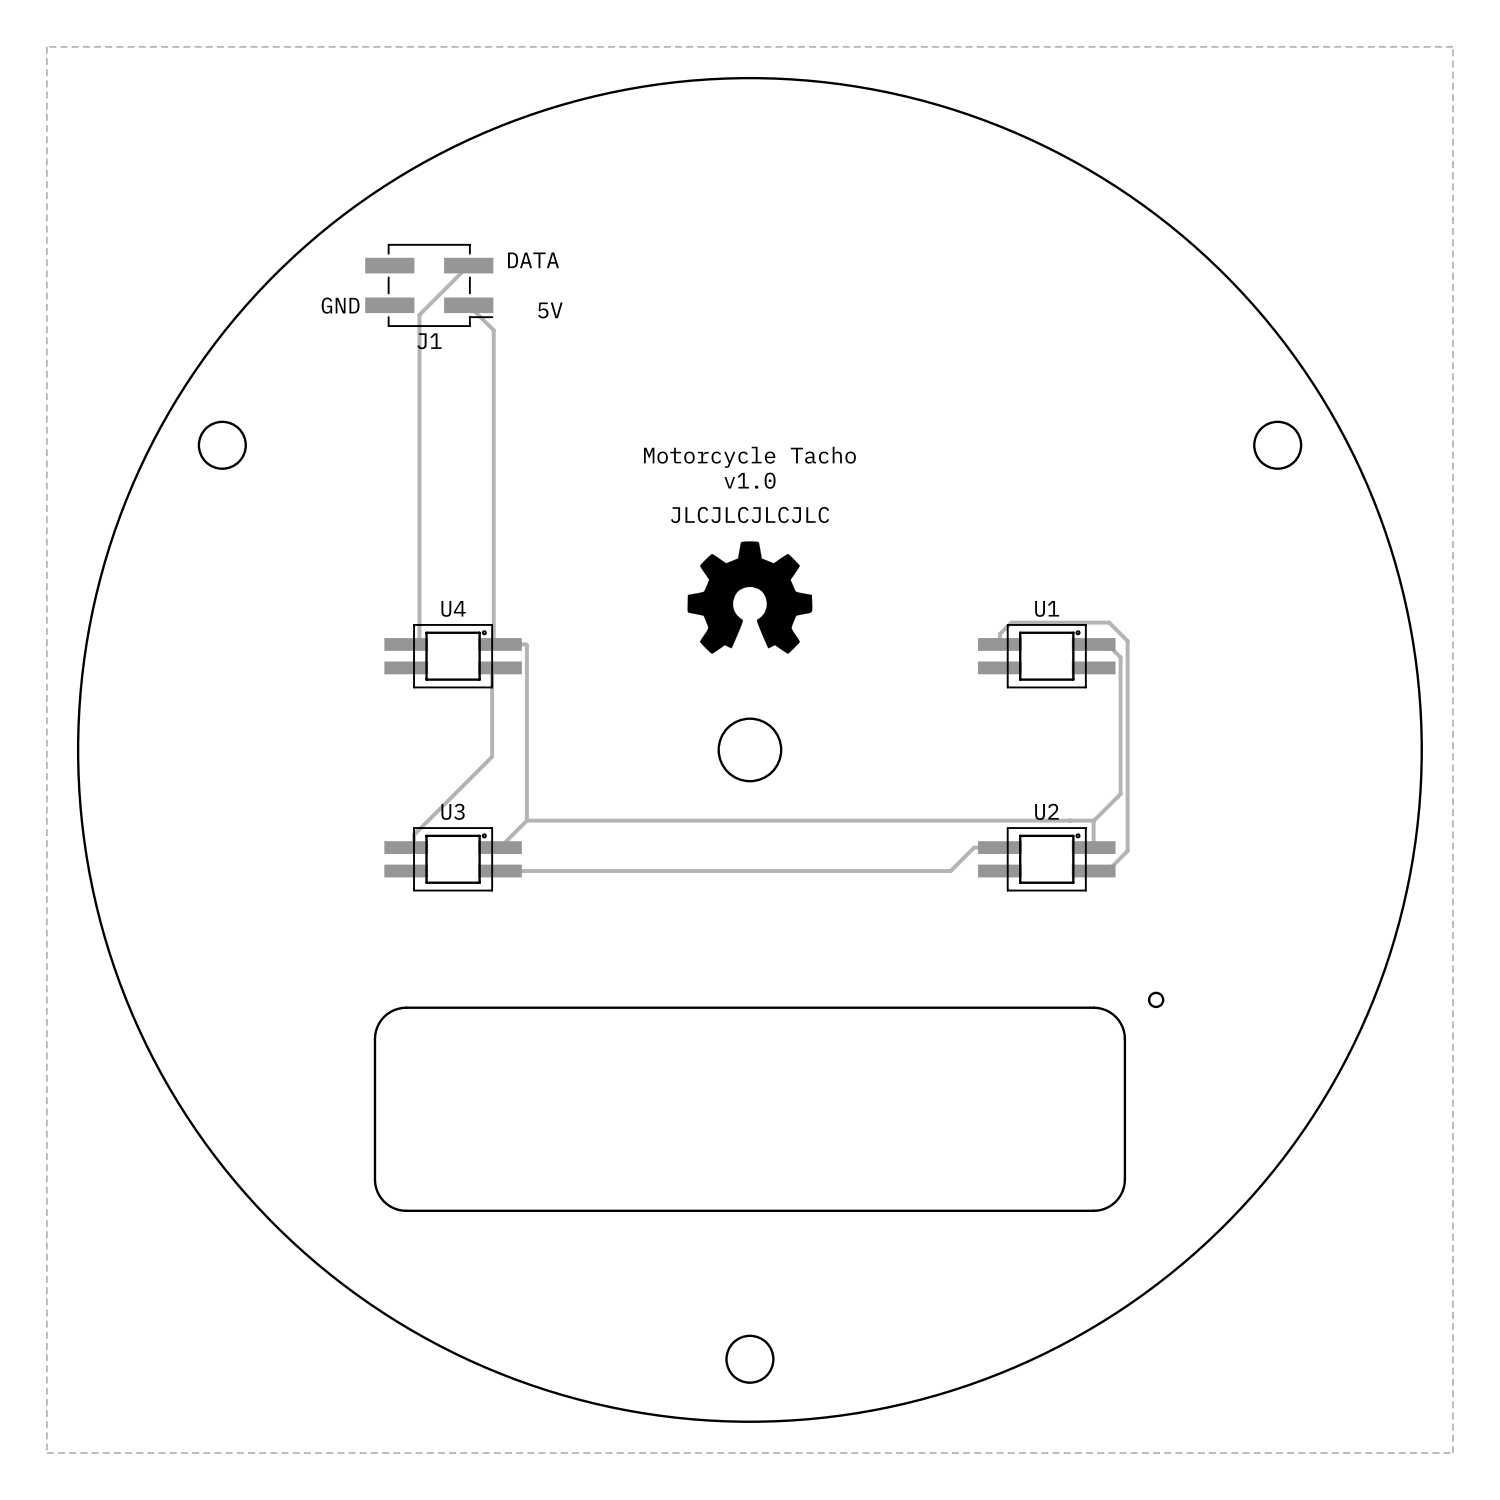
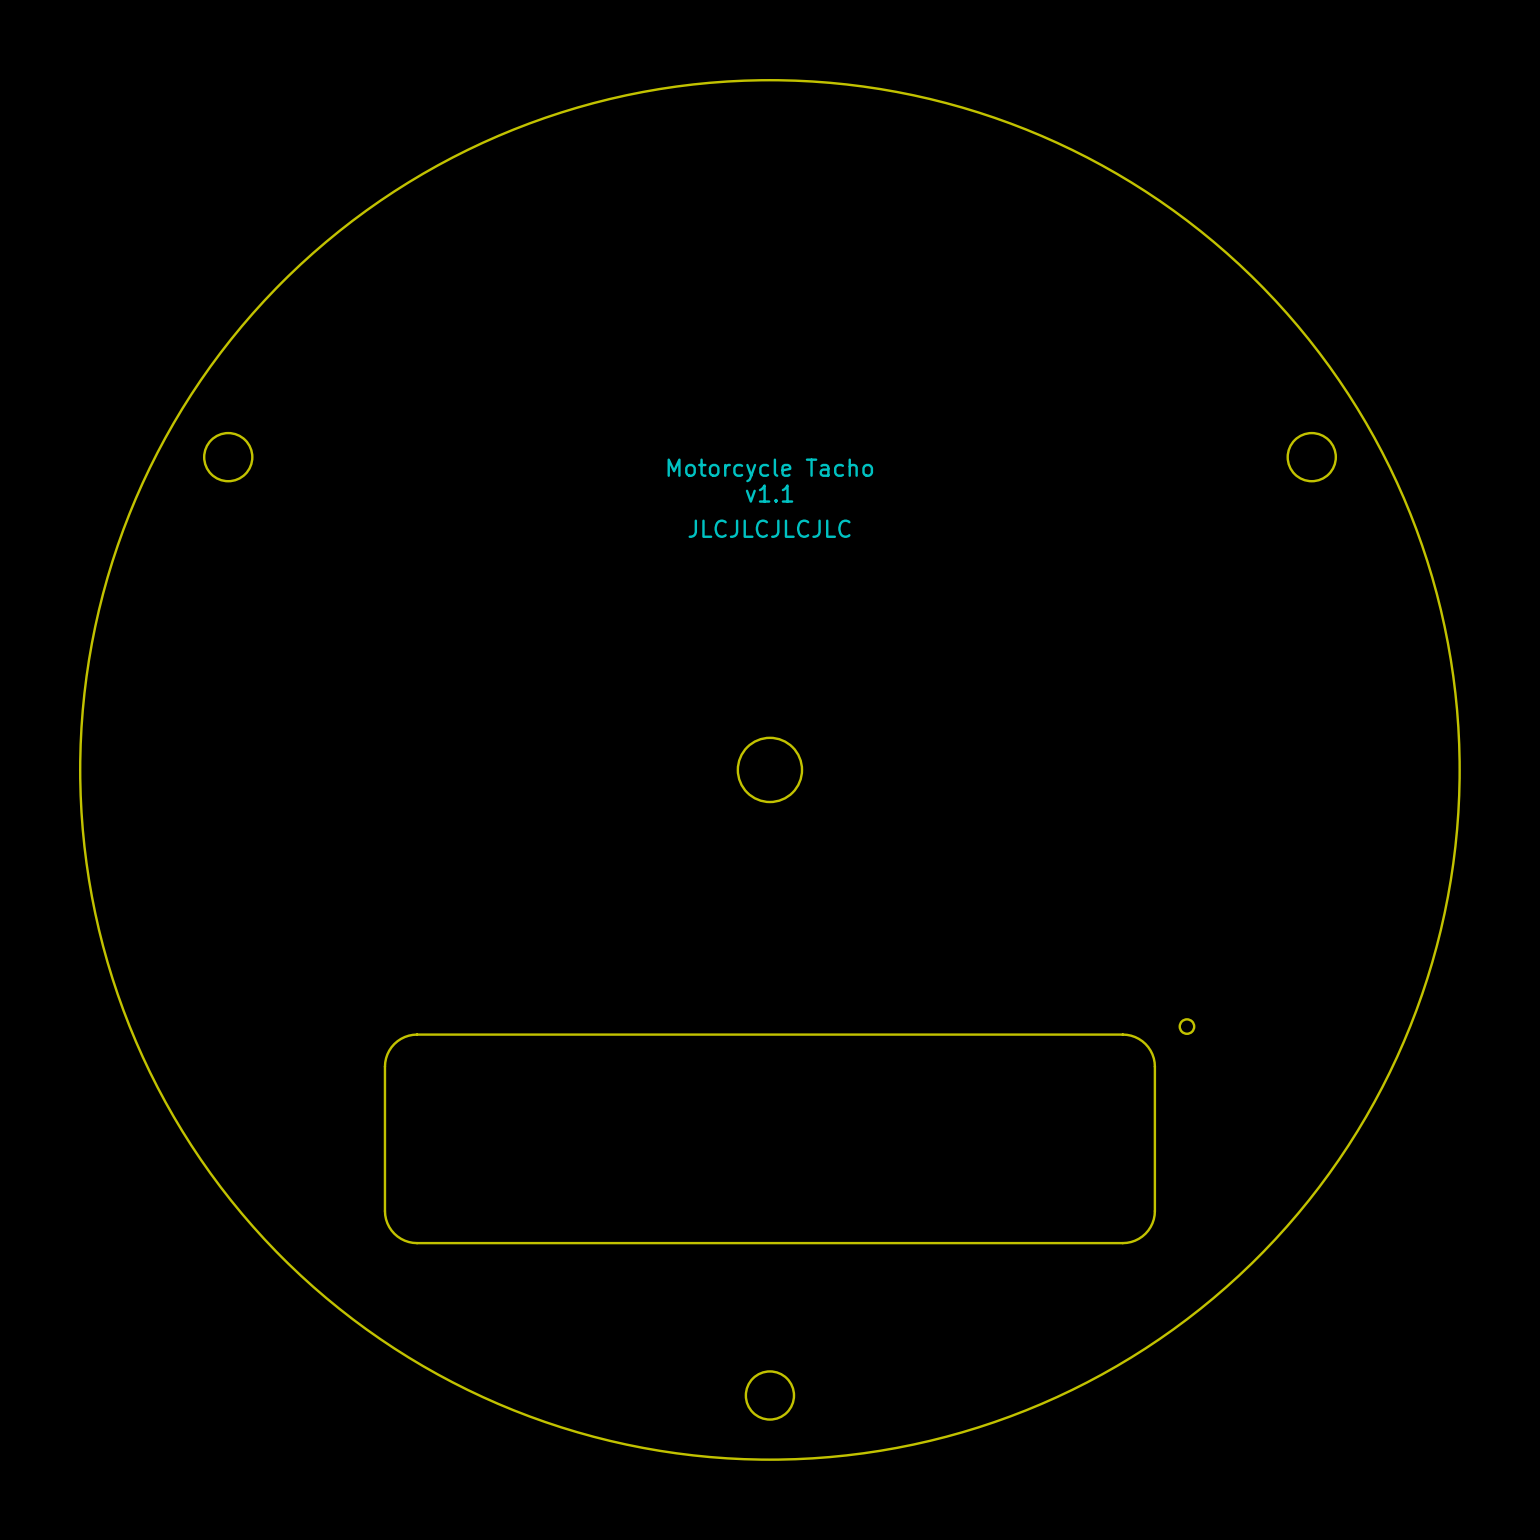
zone outline: (1452, 46) (1452, 1452) (46, 1452) (46, 46) (1452, 46) -> none
text: DATA (533, 260) -> none
track: (468, 265) (419, 314) (419, 639) (414, 644) -> none
J1: (429, 285) -> none
text: GND (340, 305) -> none
track: (468, 305) (493, 330) (493, 644) -> none
text: 5V (550, 310) -> none
text: v1.0 (750, 480) -> v1.1 (769, 493)
drawing: [687, 541, 813, 654] -> none
board edge: (479, 632) (426, 632) (426, 679) (479, 679) (479, 632) -> none
board edge: (1073, 632) (1020, 632) (1020, 679) (1073, 679) (1073, 632) -> none
track: (492, 644) (526, 645) (526, 820) -> none
track: (999, 644) (999, 634) (1011, 622) (1109, 622) (1127, 641) (1127, 851) (1107, 871) (1085, 871) -> none
track: (1093, 644) (1107, 644) (1120, 657) (1120, 794) (1093, 821) (1093, 847) -> none
U4: (453, 656) -> none
U1: (1046, 656) -> none
track: (492, 667) (492, 756) (414, 834) (414, 847) -> none
track: (526, 820) (499, 847) -> none
track: (1094, 820) (526, 820) -> none
board edge: (479, 835) (426, 835) (426, 882) (479, 882) (479, 835) -> none
board edge: (1073, 835) (1073, 882) (1020, 882) (1020, 835) (1073, 835) -> none
track: (999, 847) (974, 847) (950, 871) (492, 871) -> none
U3: (453, 859) -> none
U2: (1046, 859) -> none

